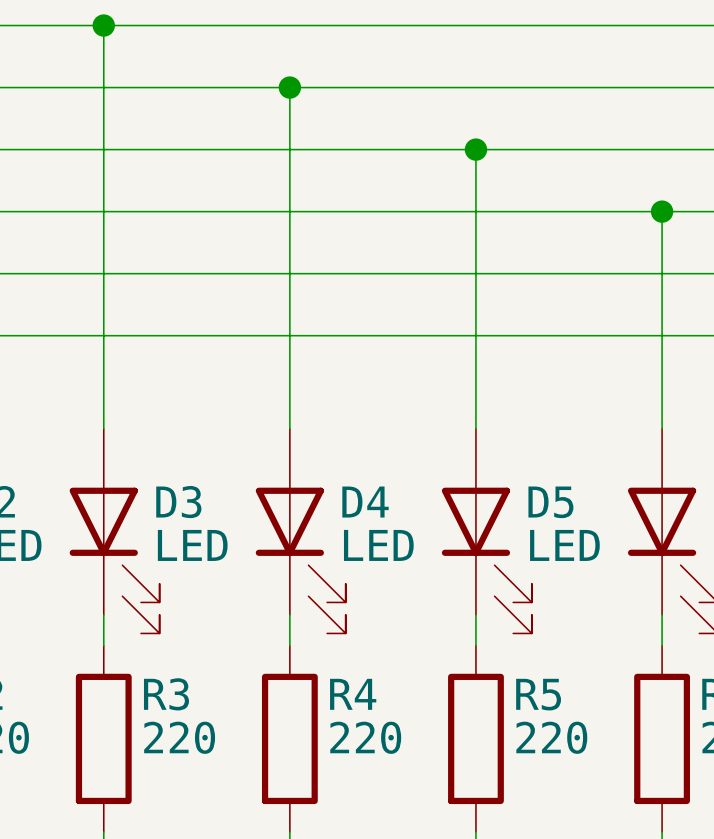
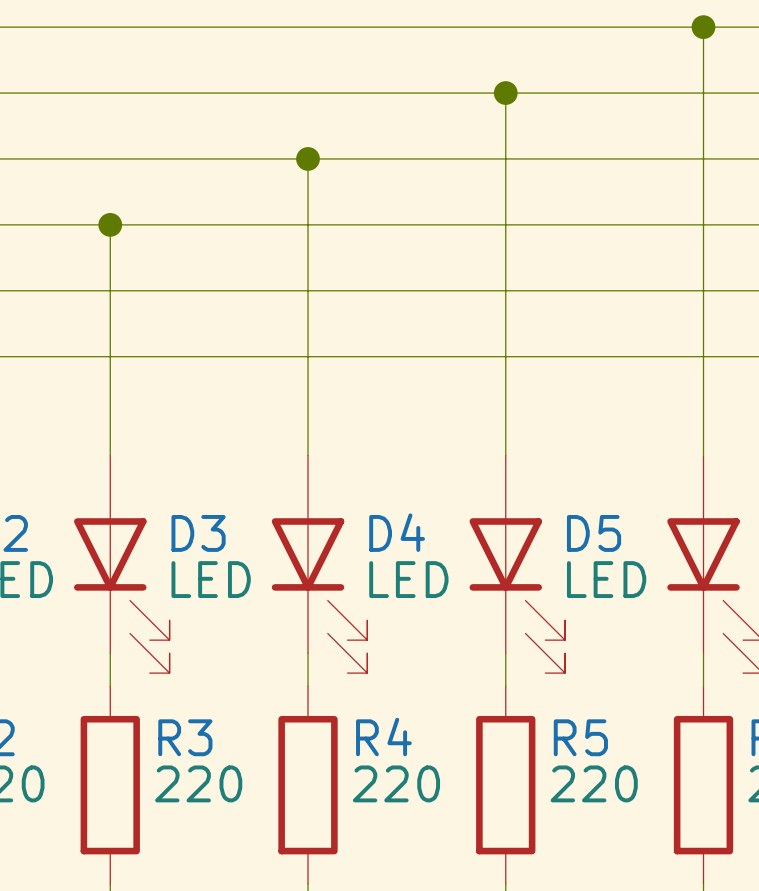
wire: (103, 25) (103, 211) -> (703, 27) (703, 224)
junction: (103, 25) -> none
junction: none -> (703, 27)
wire: (289, 87) (289, 149) -> (505, 93) (505, 158)
junction position: (289, 87) -> (308, 158)
junction position: (475, 149) -> (505, 93)
junction: none -> (110, 224)
junction: (662, 211) -> none

